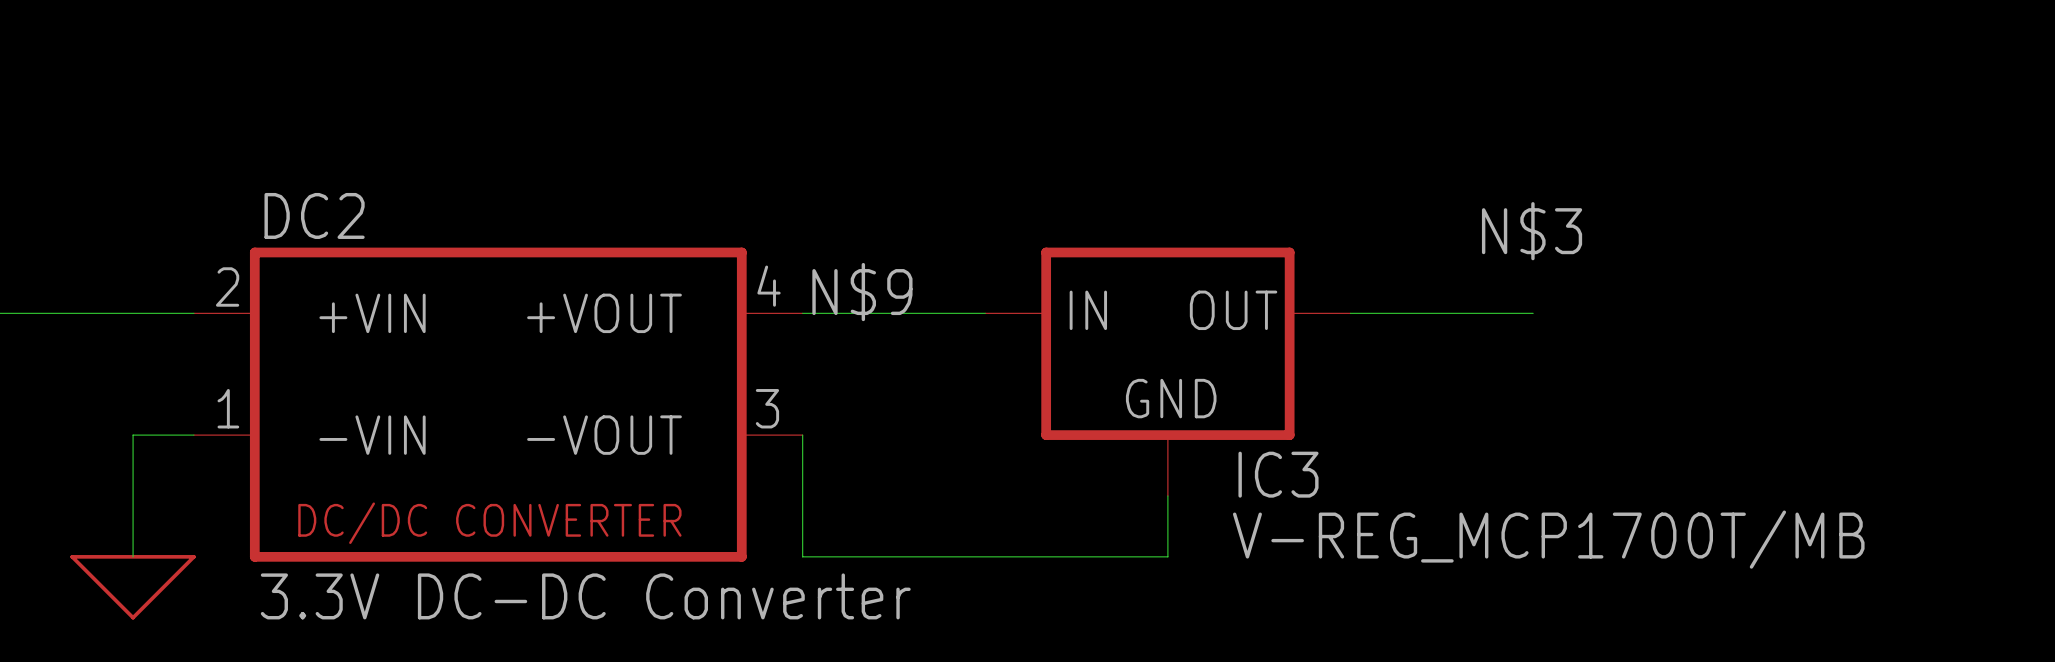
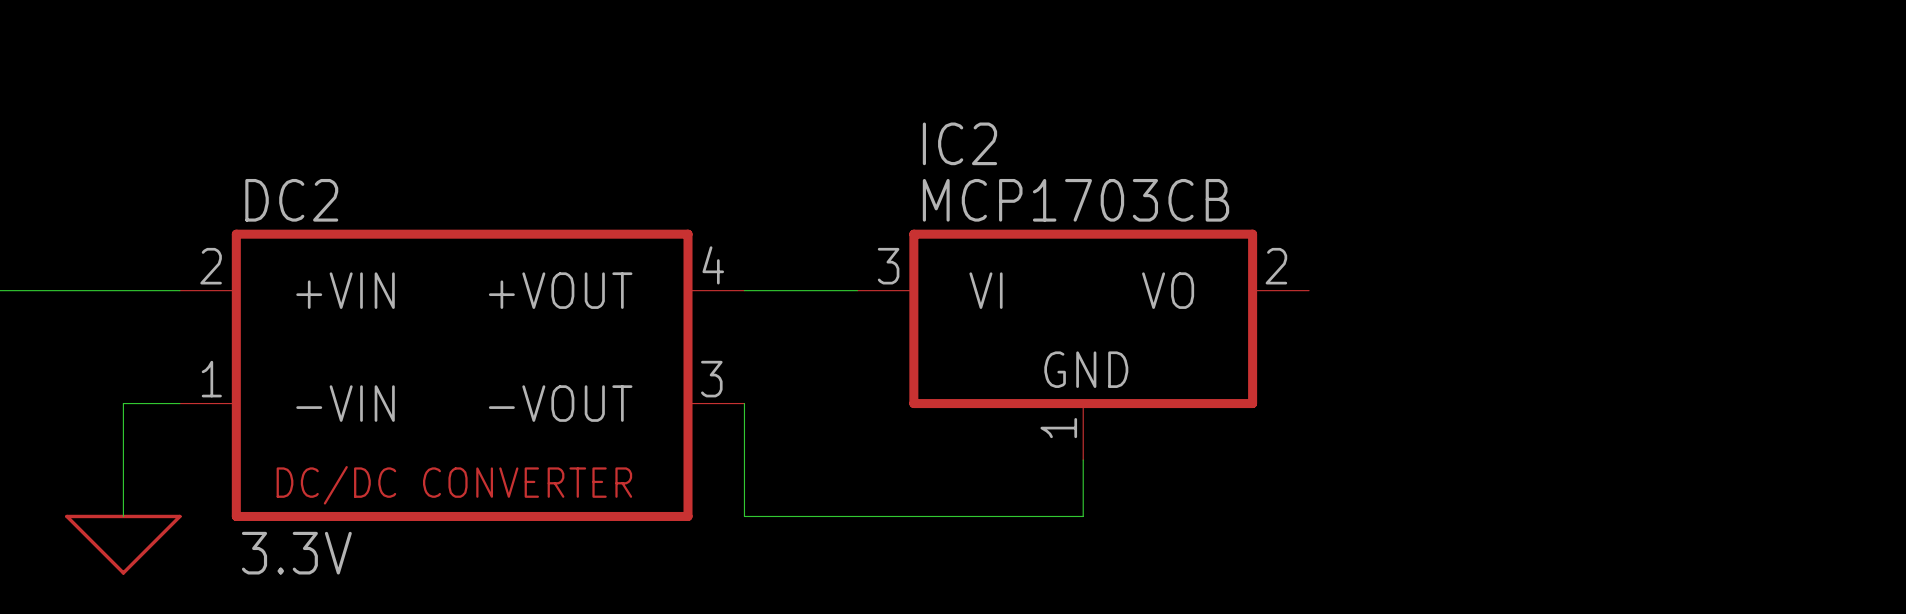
label: N$3 (1532, 231) -> none
label: N$9 (862, 292) -> none
wire: (1350, 313) (1533, 313) -> none
IC3: V-REG_MCP1700T/MB (1167, 371) -> none
IC2: none -> MCP1703CB (1083, 344)
DC2 value: 3.3V DC-DC Converter (585, 596) -> 3.3V (296, 553)

